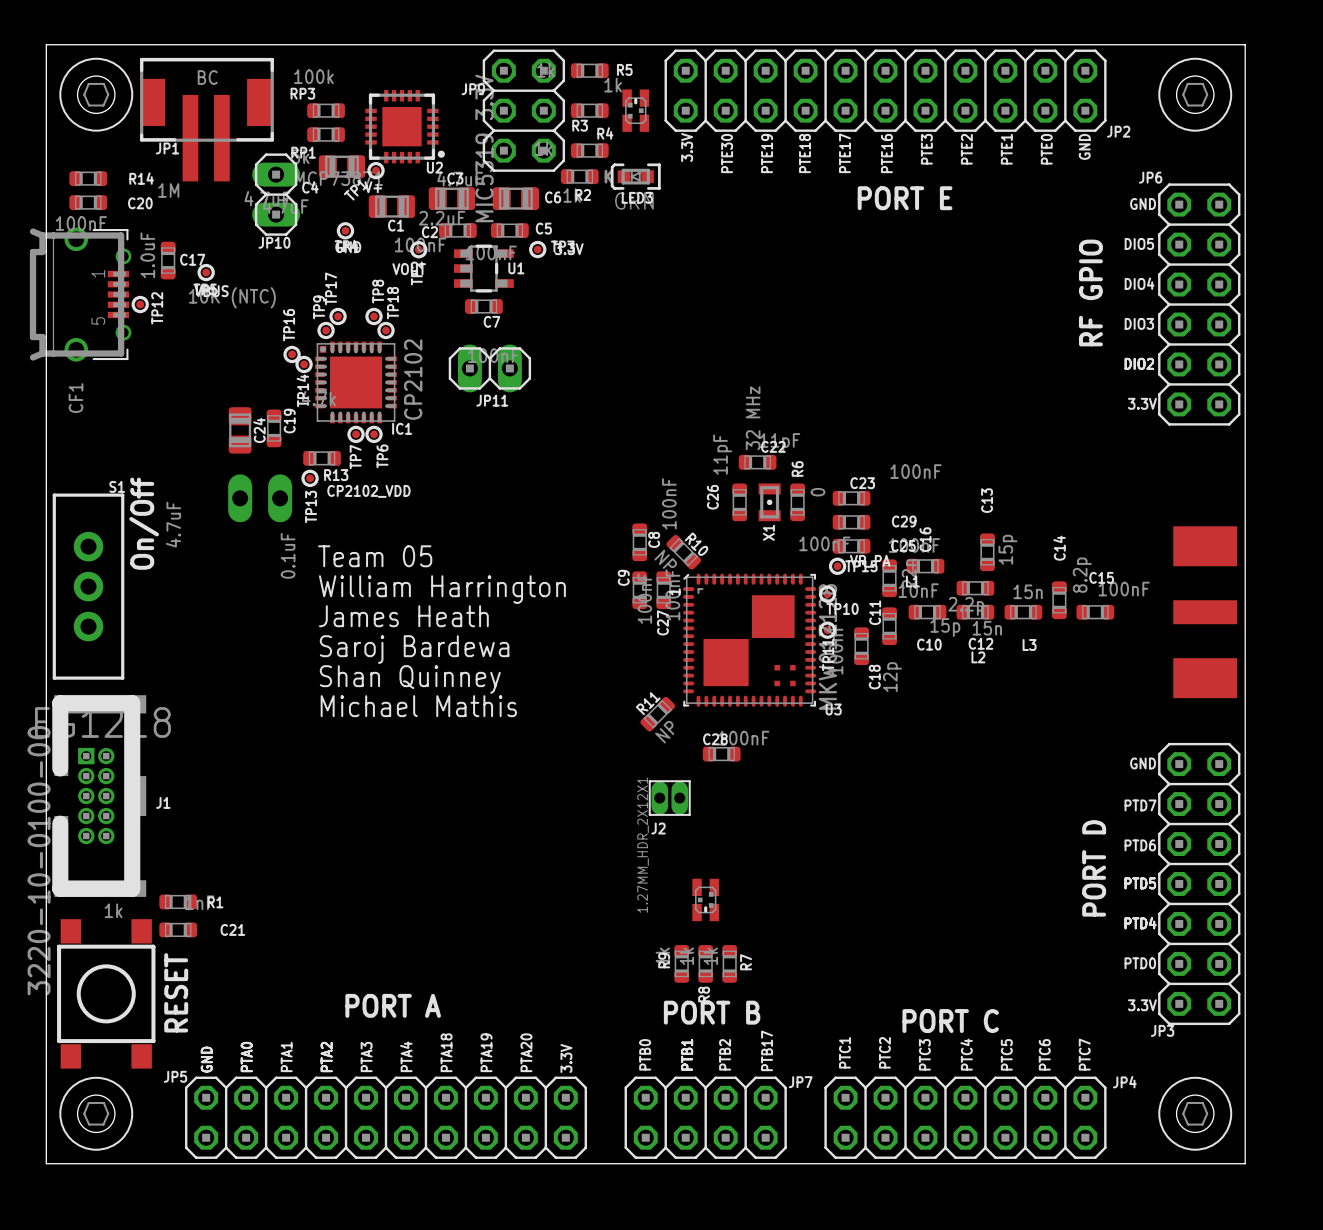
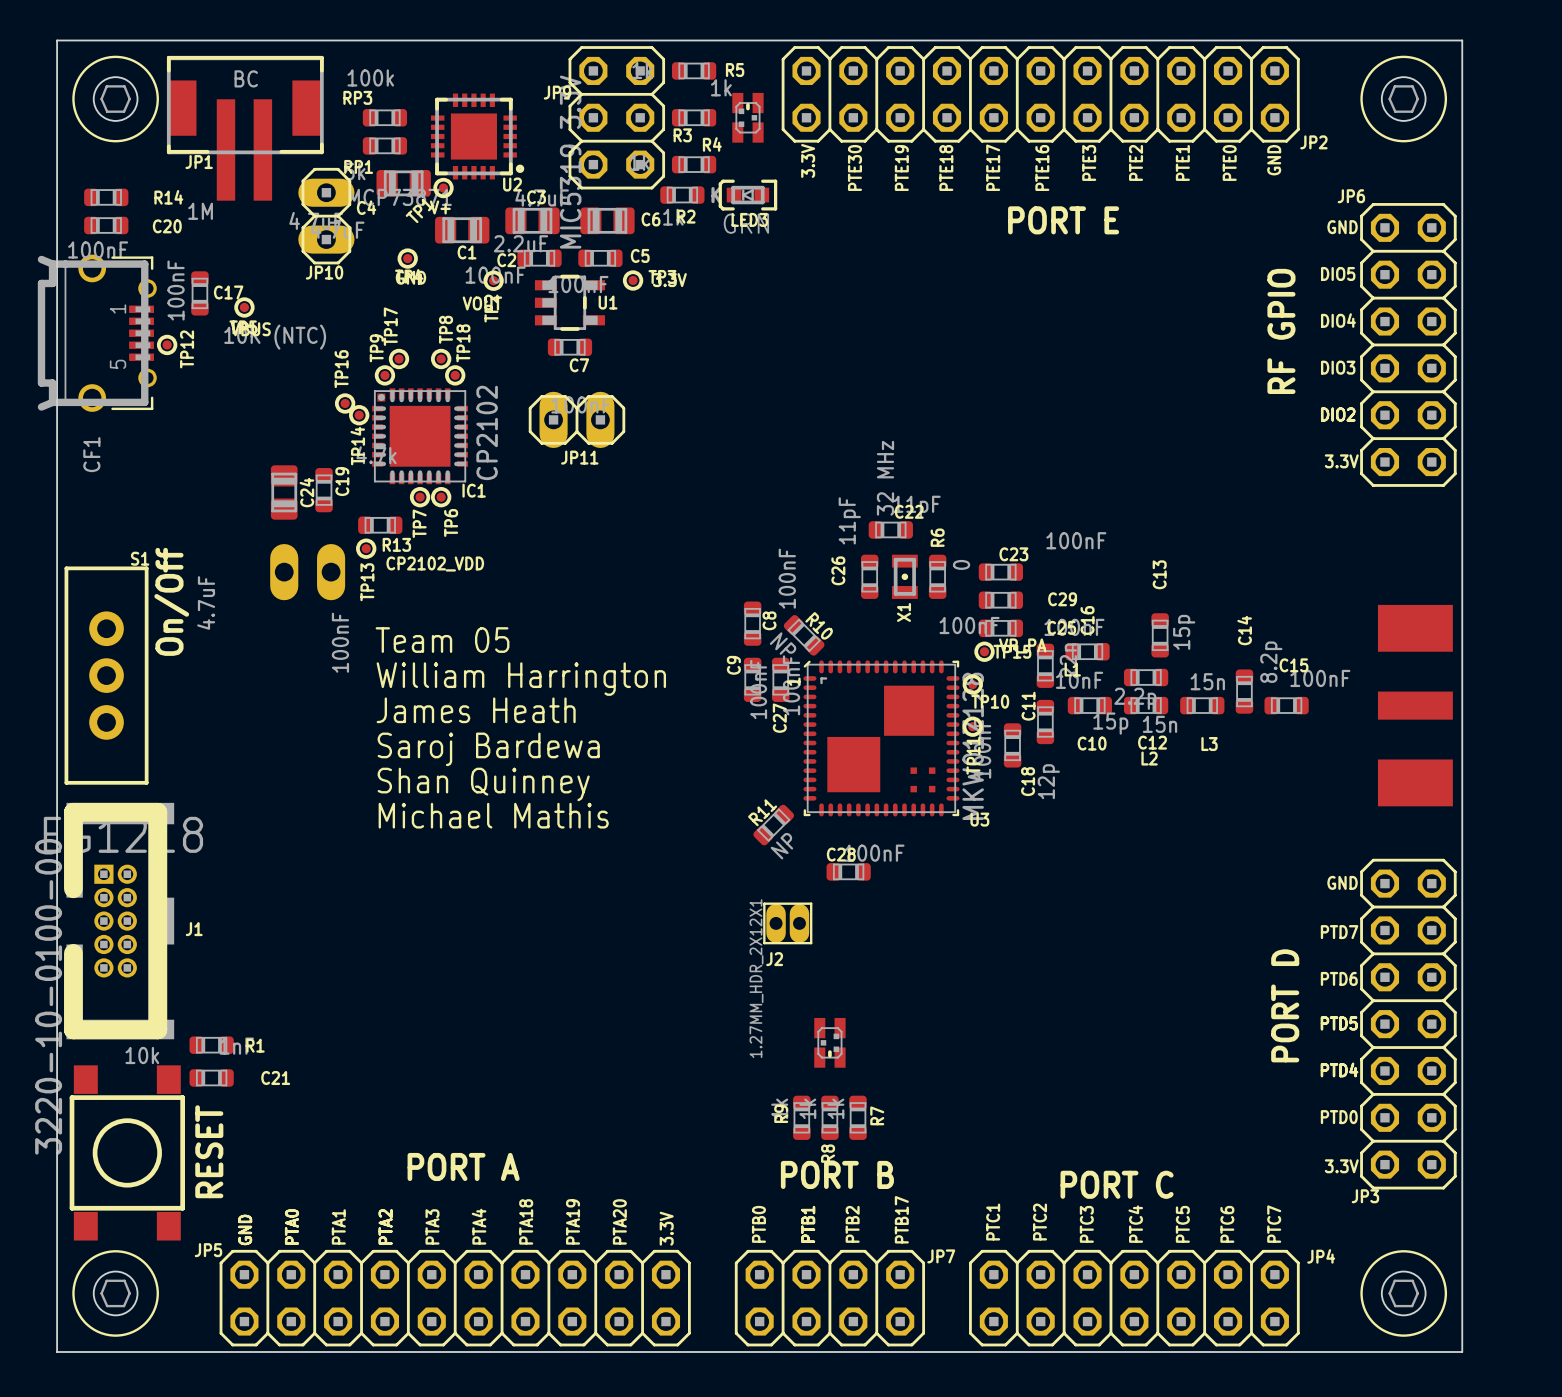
C17 value: 1.0uF (147, 255) -> 100nF (176, 290)
C19 value: 0.1uF (288, 555) -> 100nF (340, 642)
R1 value: 1k (113, 910) -> 10k (142, 1055)

